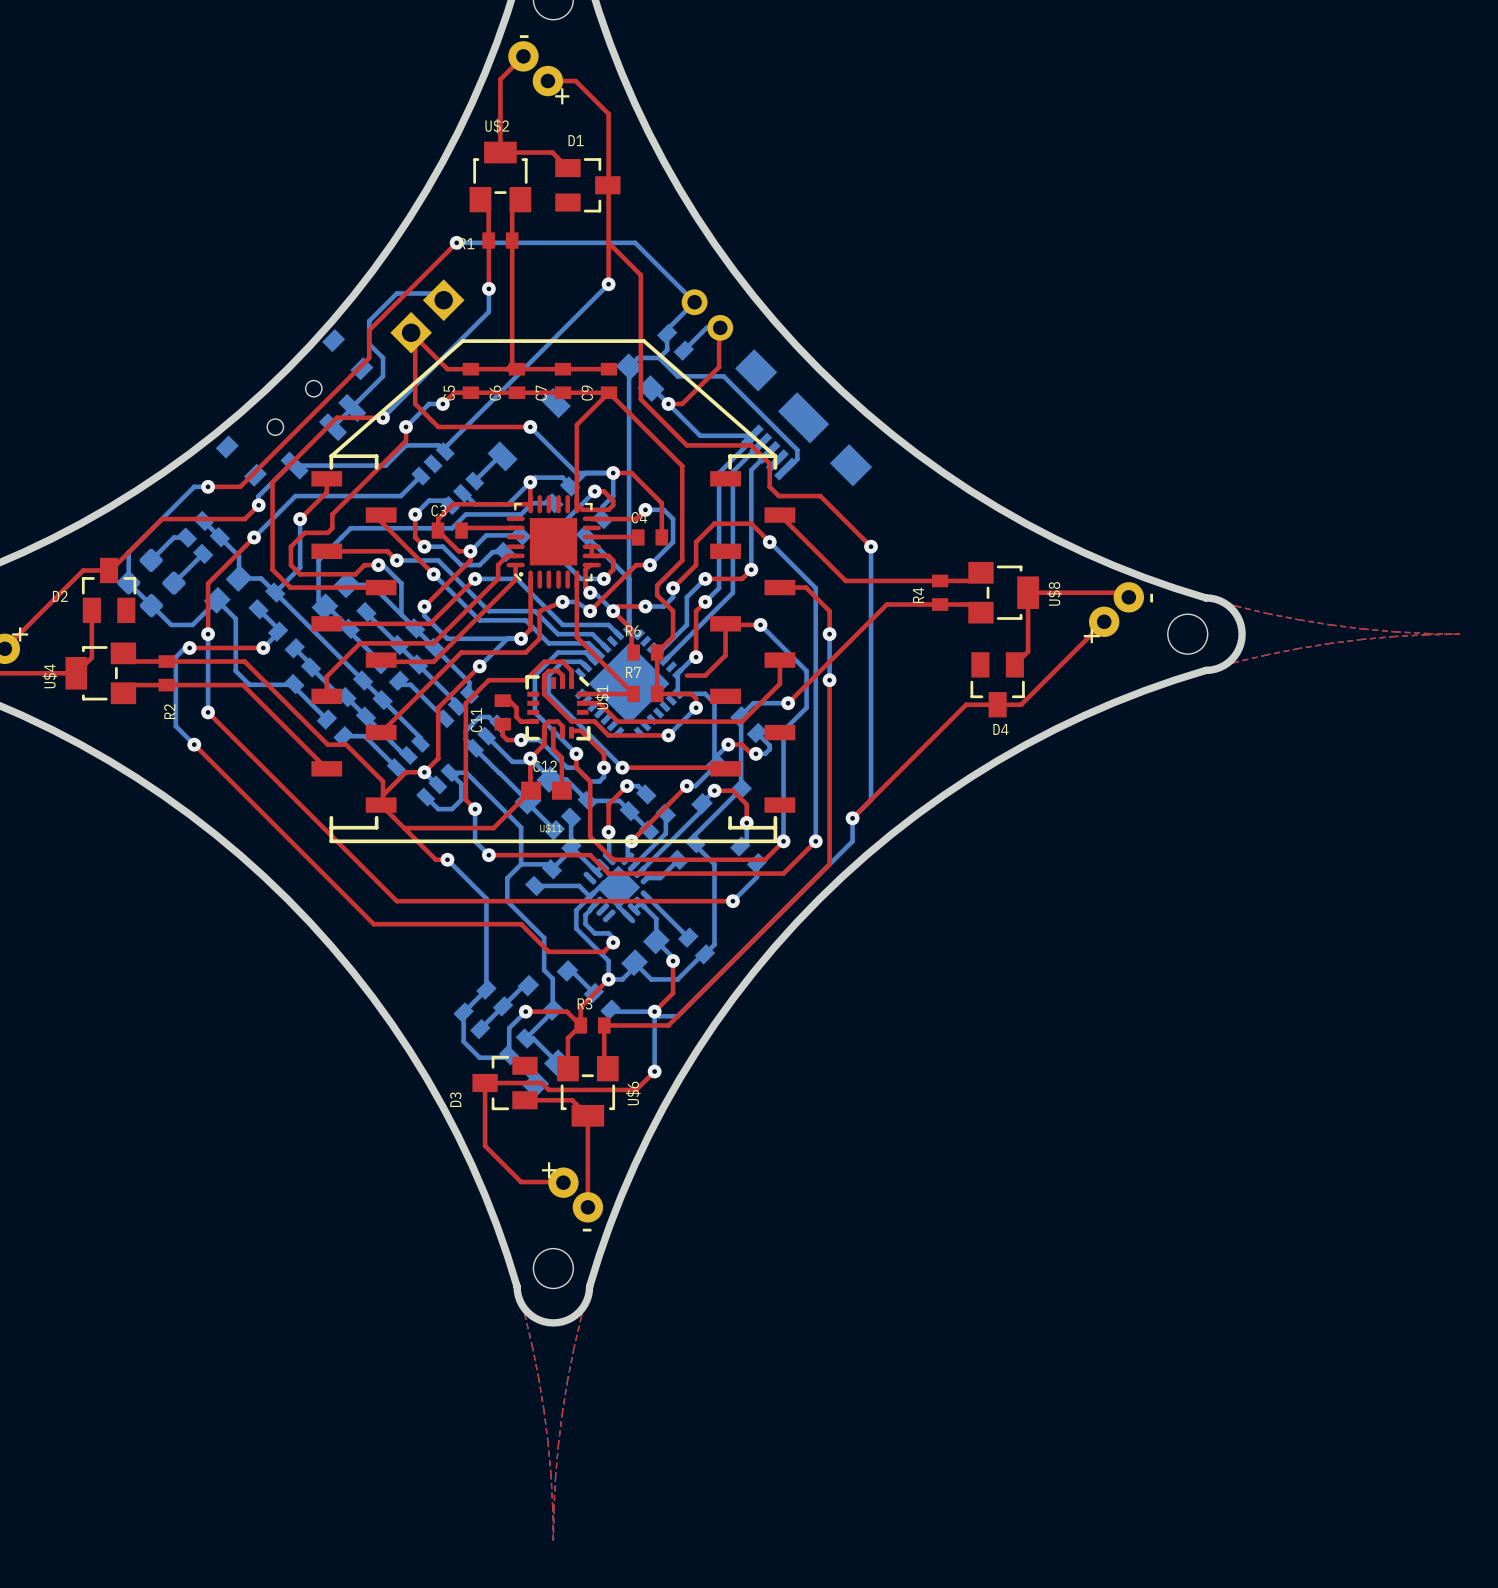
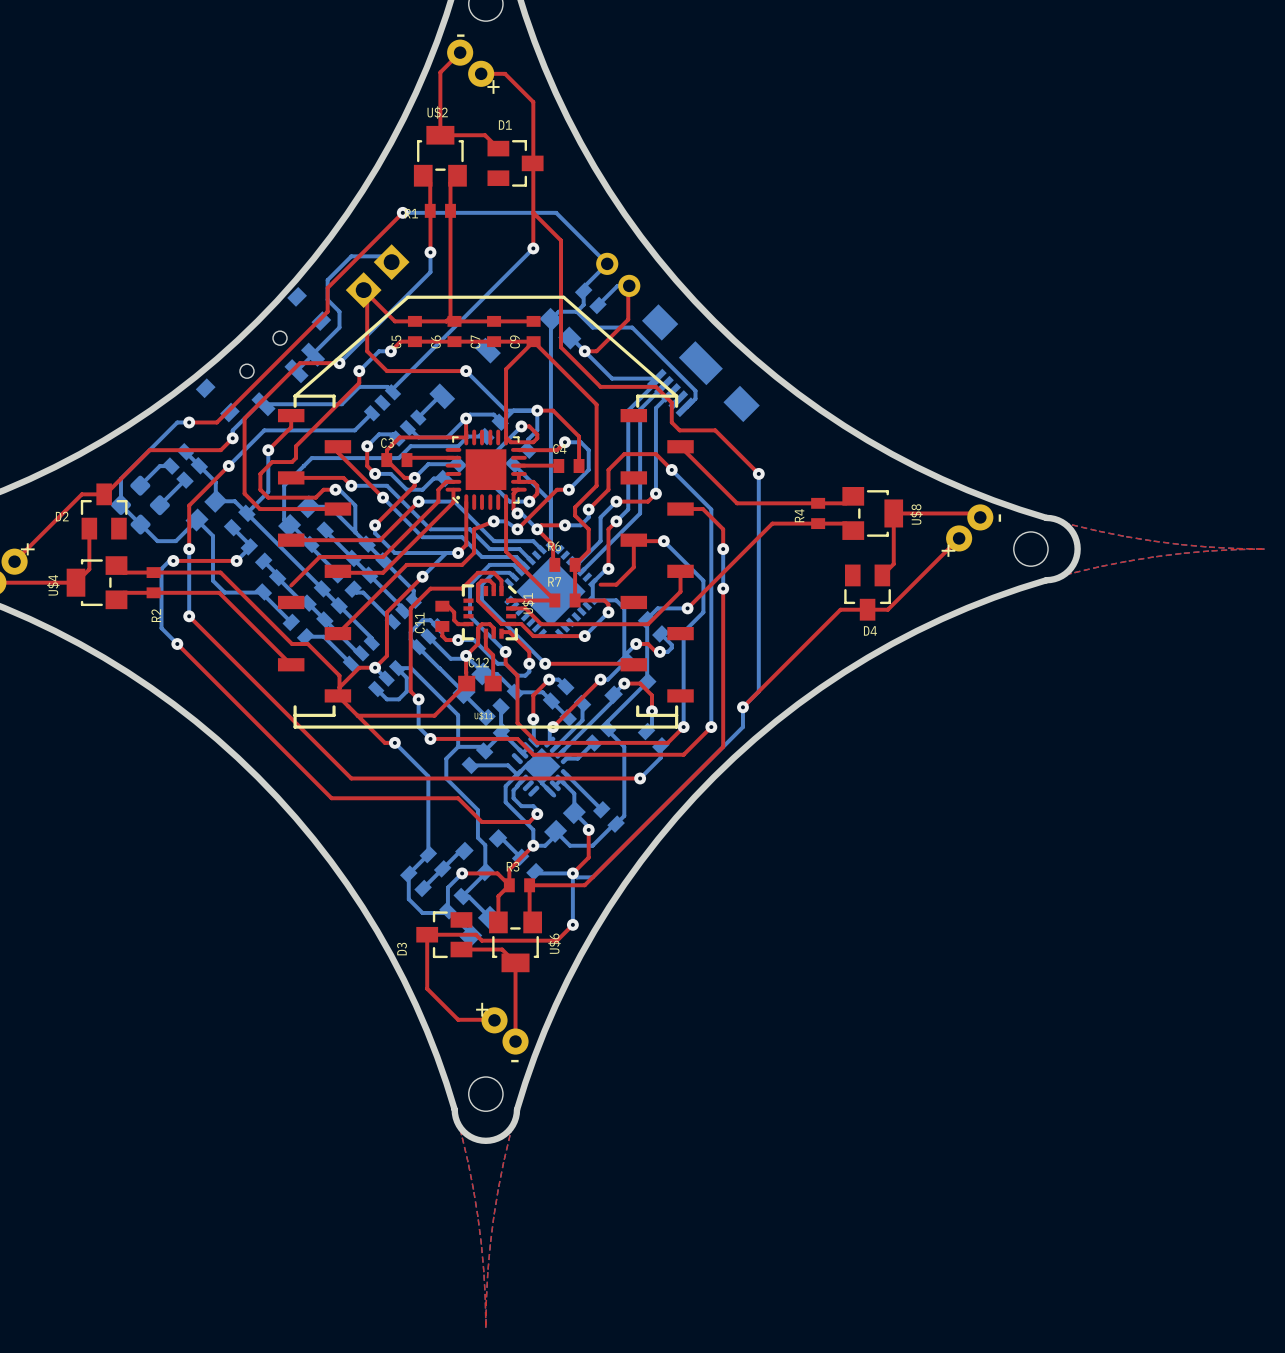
top track: (326, 676) (326, 696) -> none

